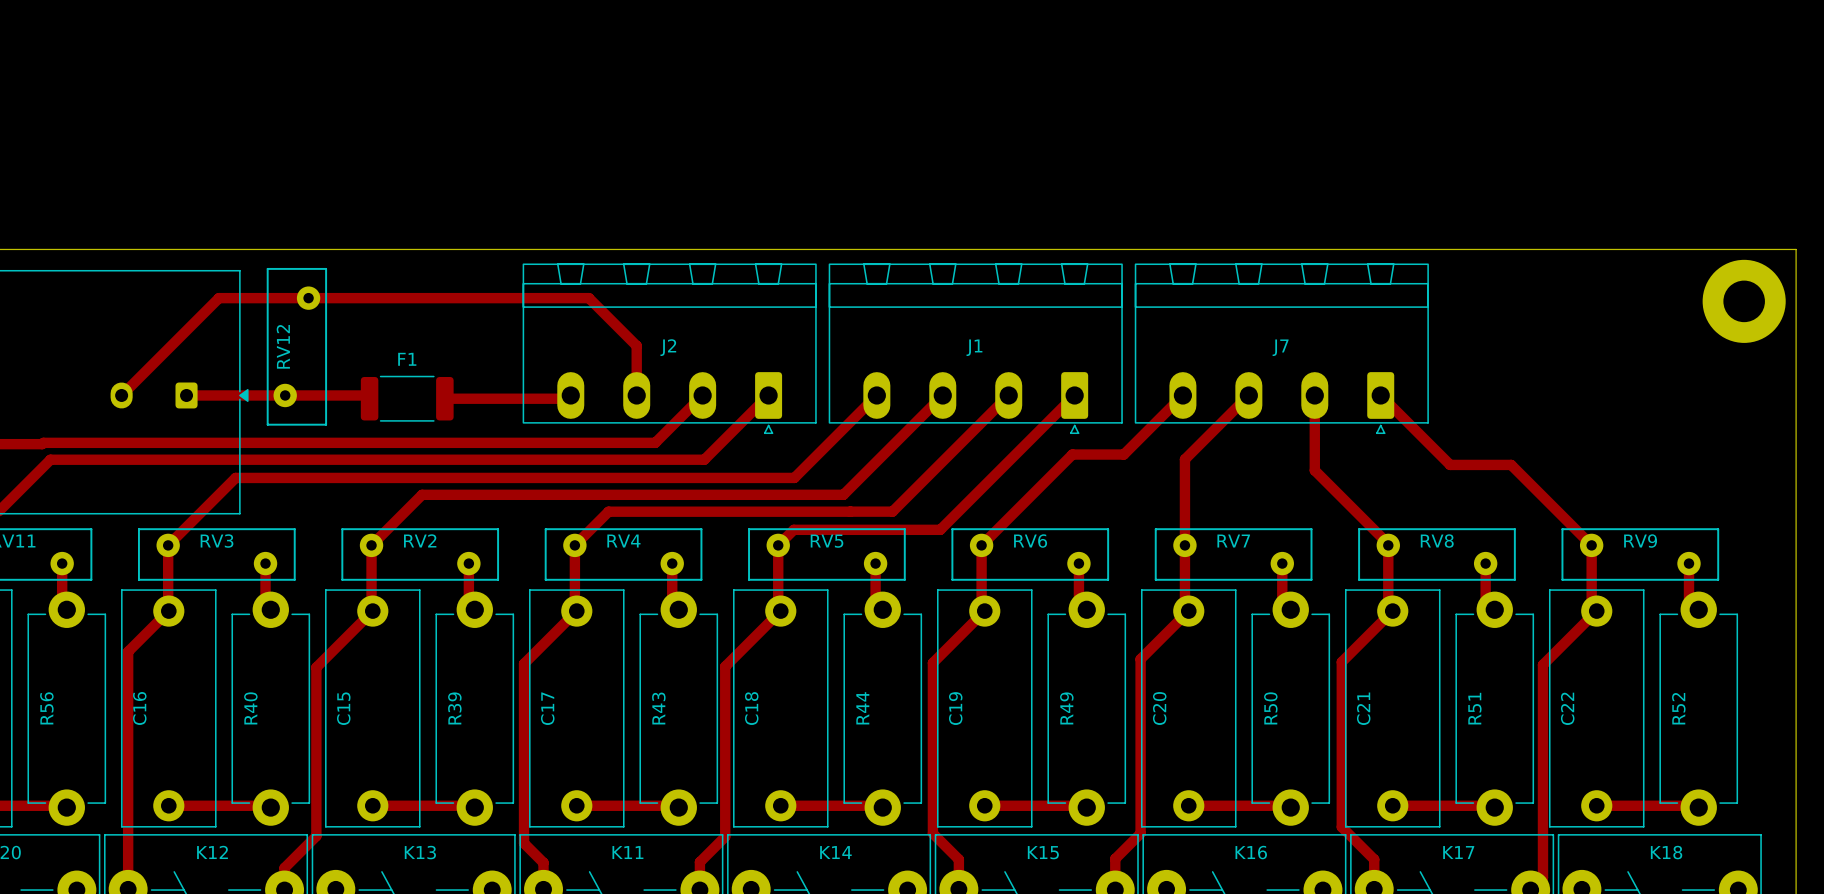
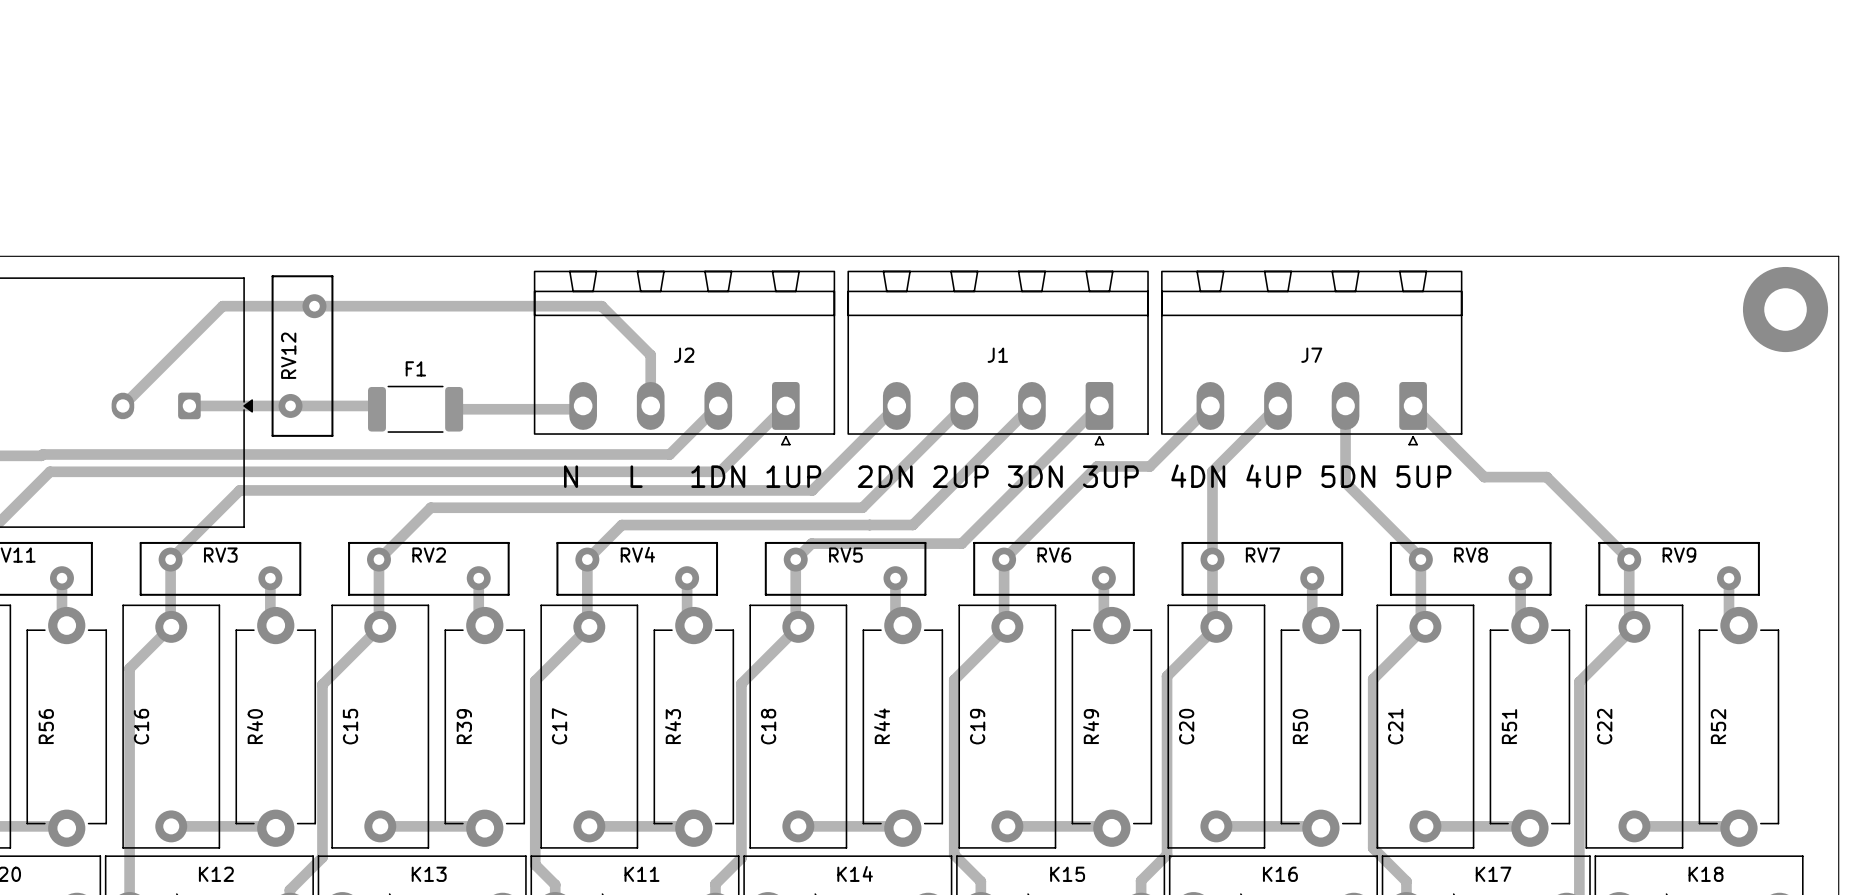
text: none -> N L 1DN 1UP (692, 476)
text: none -> 2DN 2UP 3DN 3UP (998, 476)
text: none -> 4DN 4UP 5DN 5UP (1311, 476)

